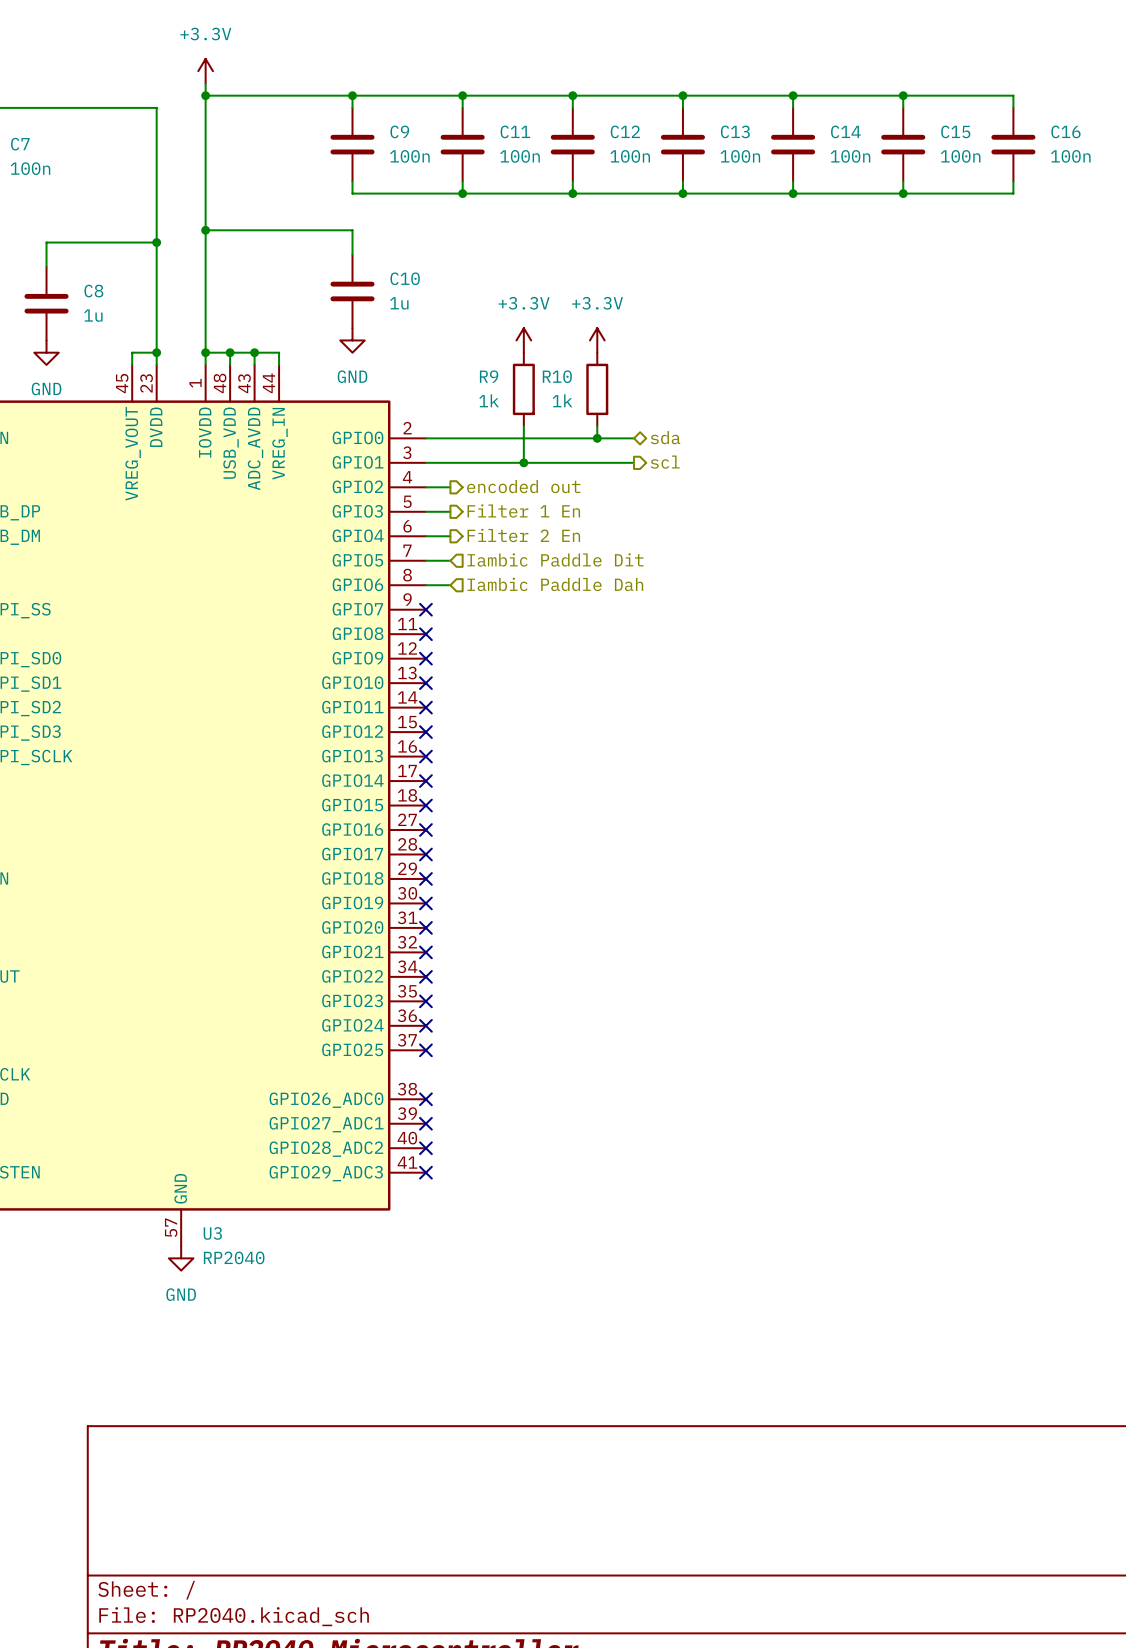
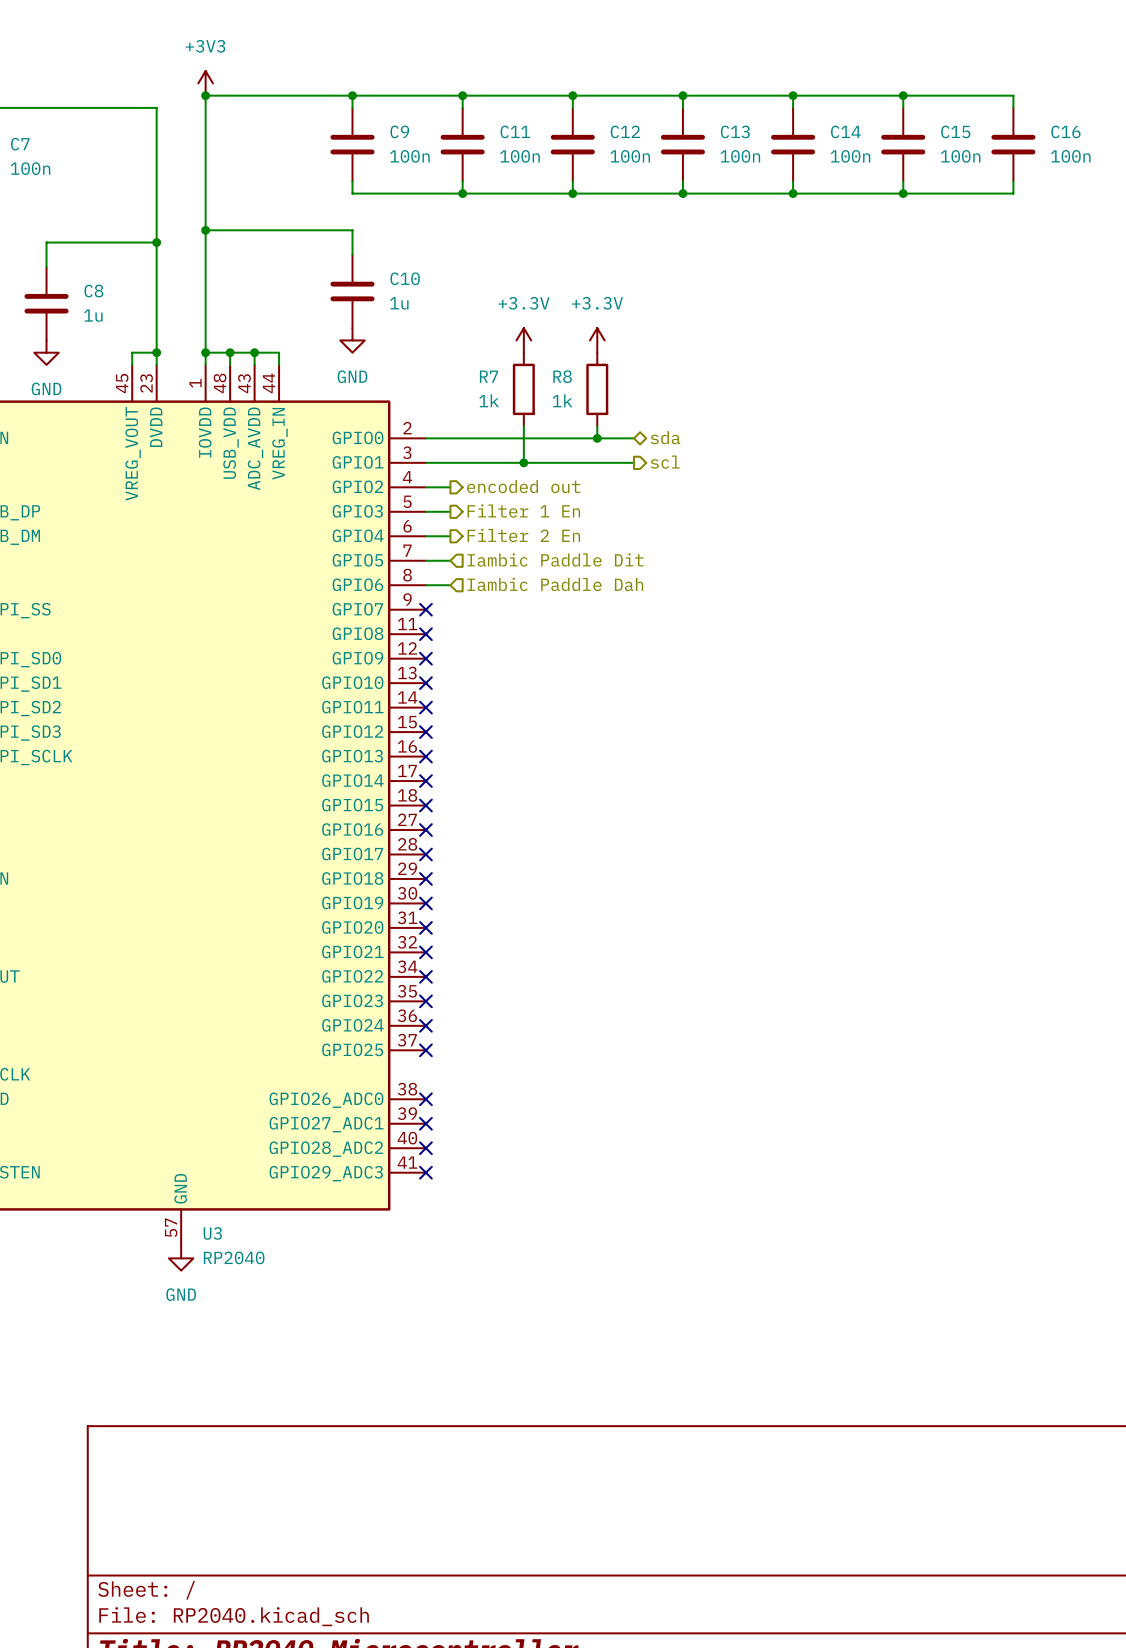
power symbol: +3.3V (205, 71) -> none
power symbol: none -> +3V3 (205, 83)
R9 name: R9 (489, 376) -> R7 (489, 376)
R10 name: R10 (557, 376) -> R8 (562, 376)

